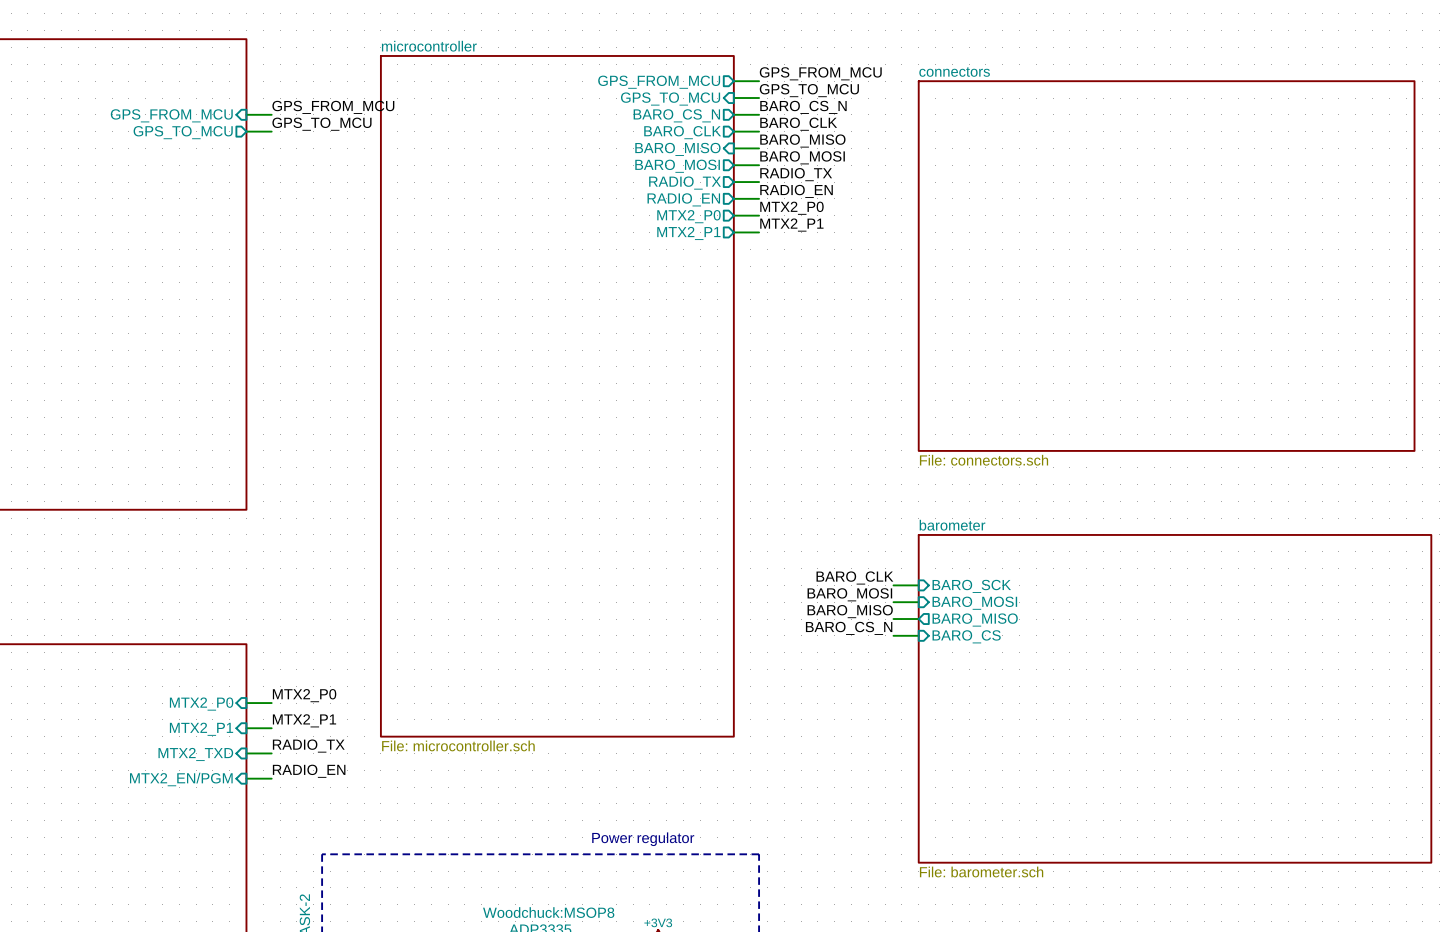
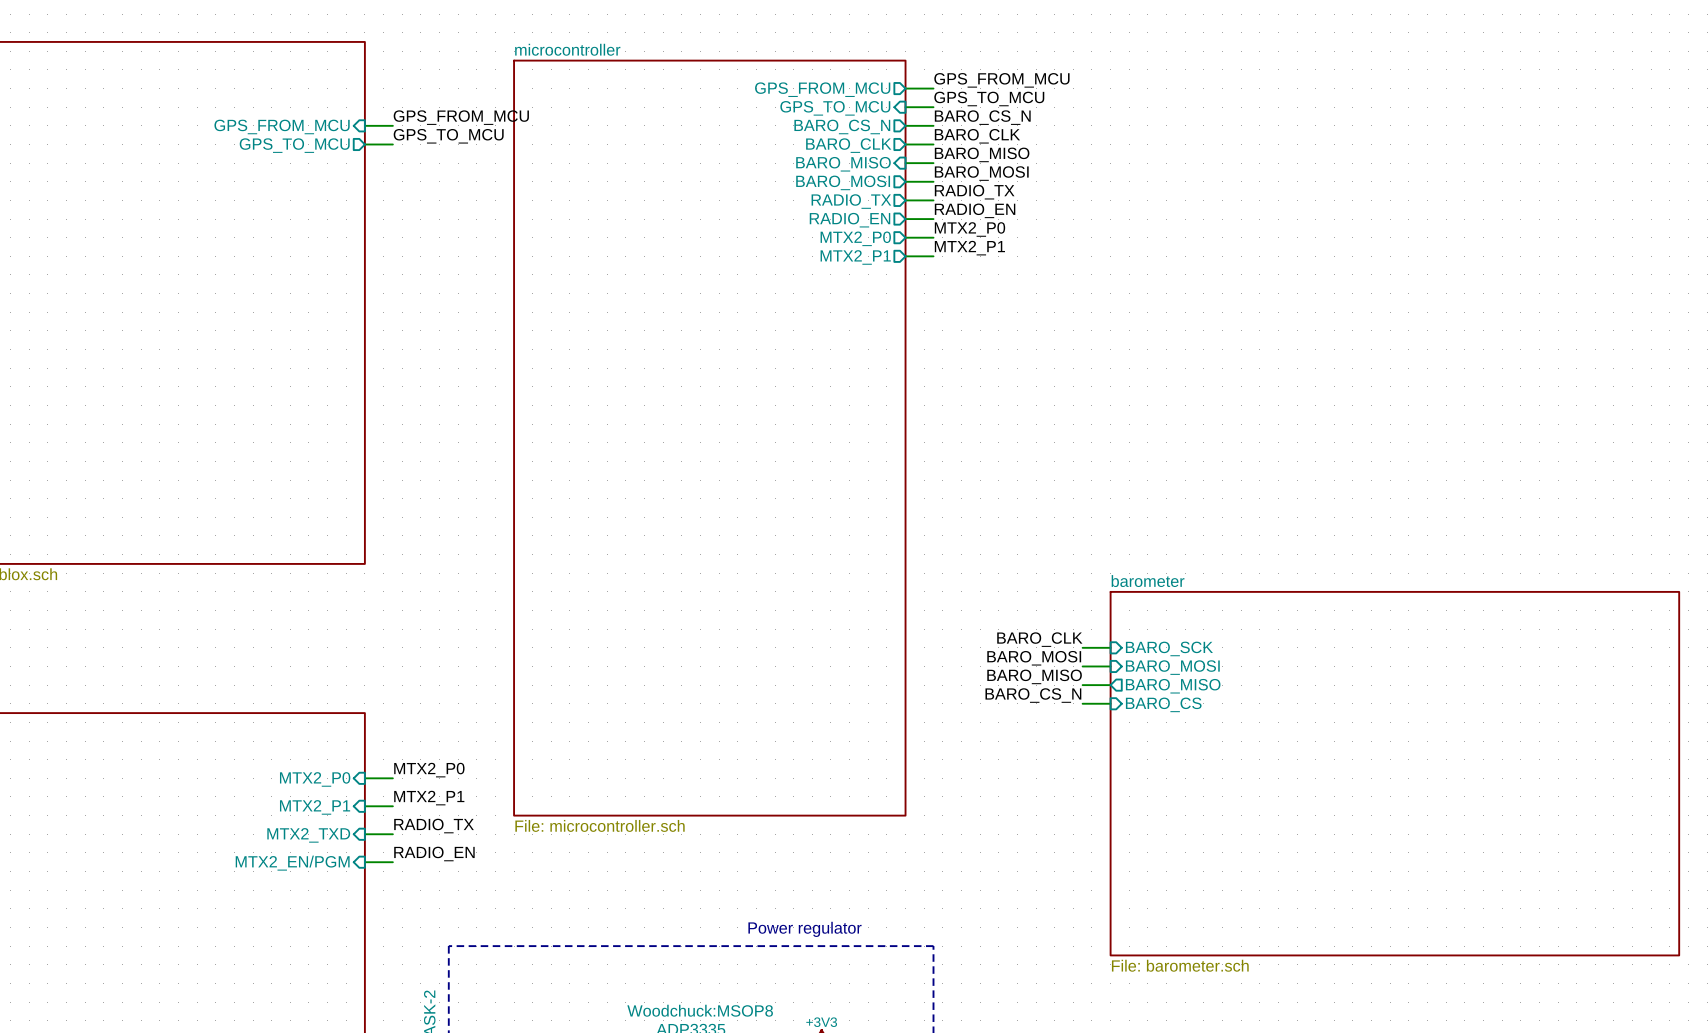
sheet connectors: File: connectors.sch (1166, 266) -> none

